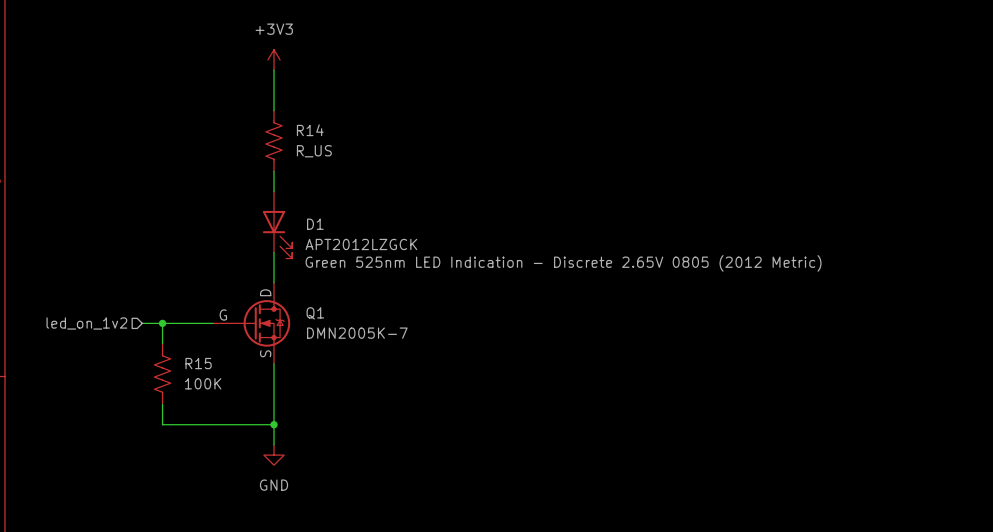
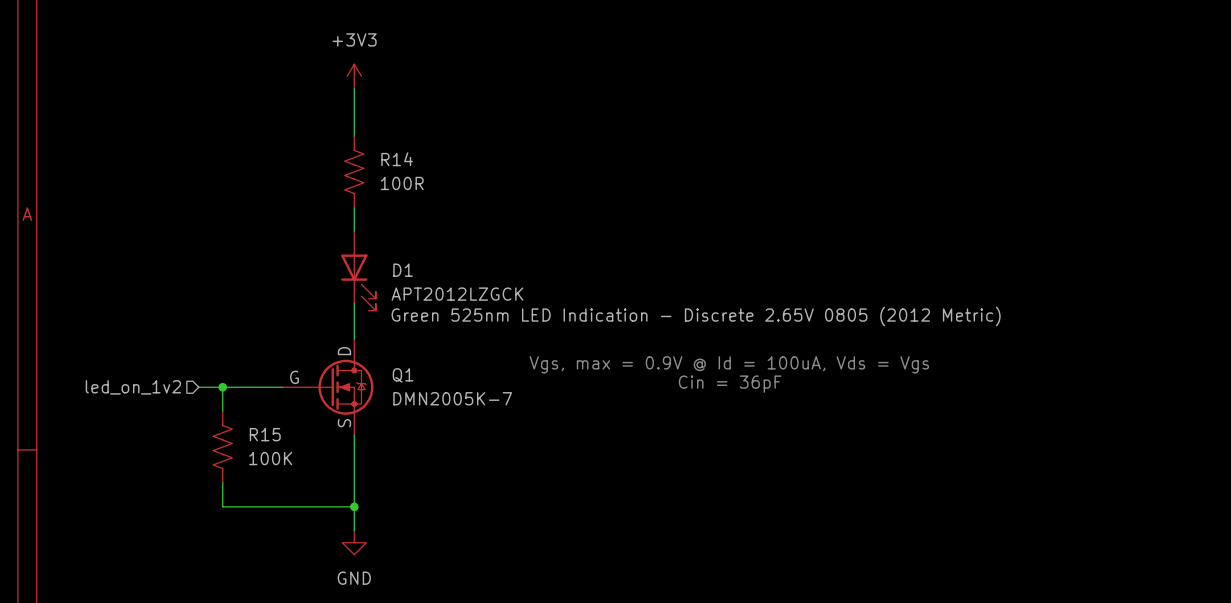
R14 value: R_US (314, 151) -> 100R (402, 183)
text: none -> Vgs, max = 0.9V @ Id = 100uA, Vds = Vgs (729, 364)
text: none -> Cin = 36pF (730, 384)

